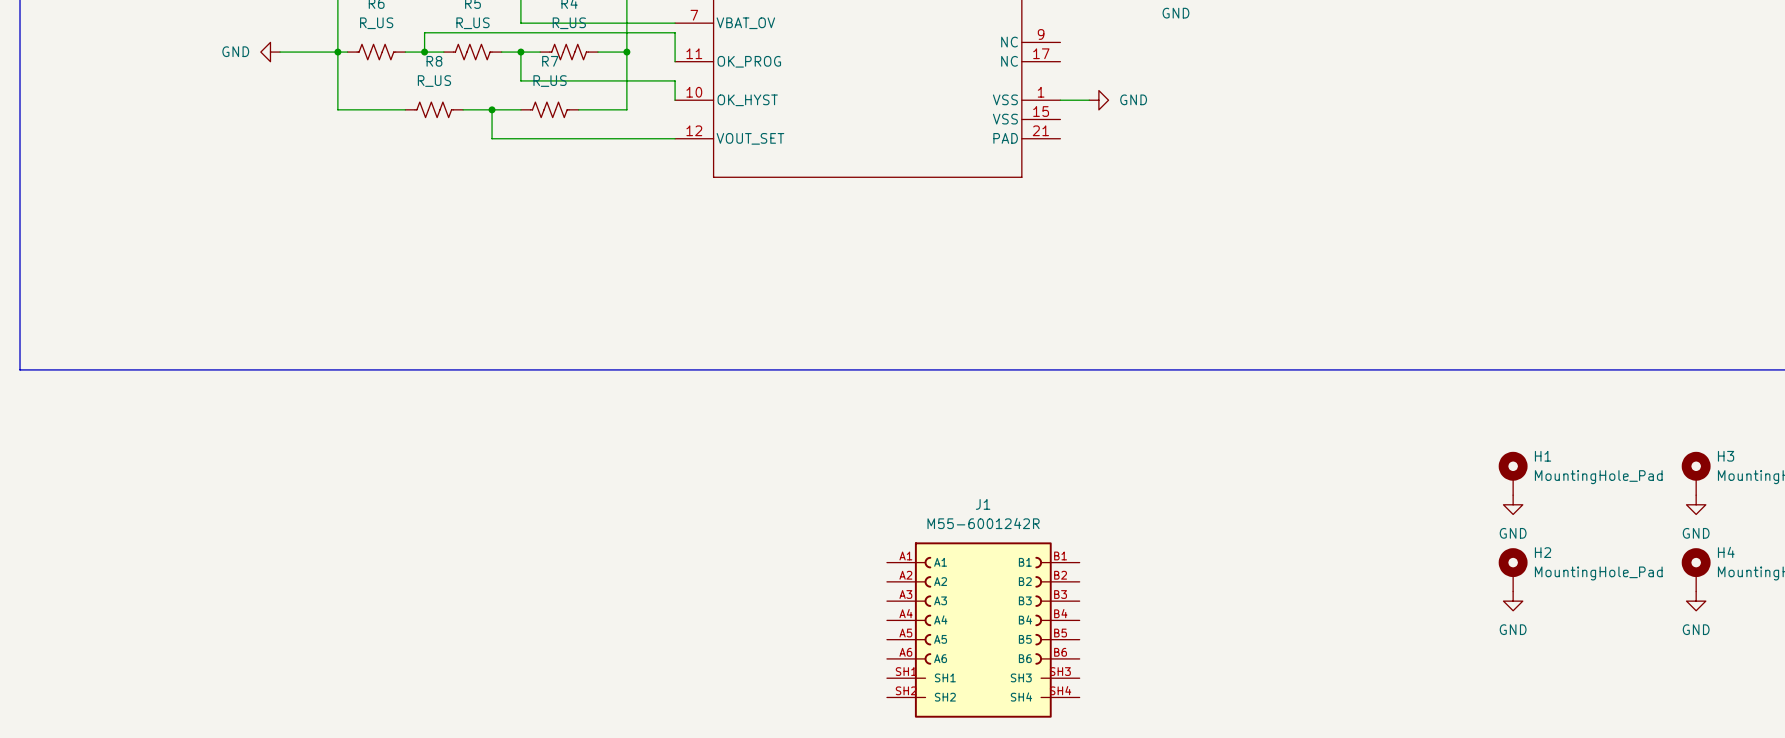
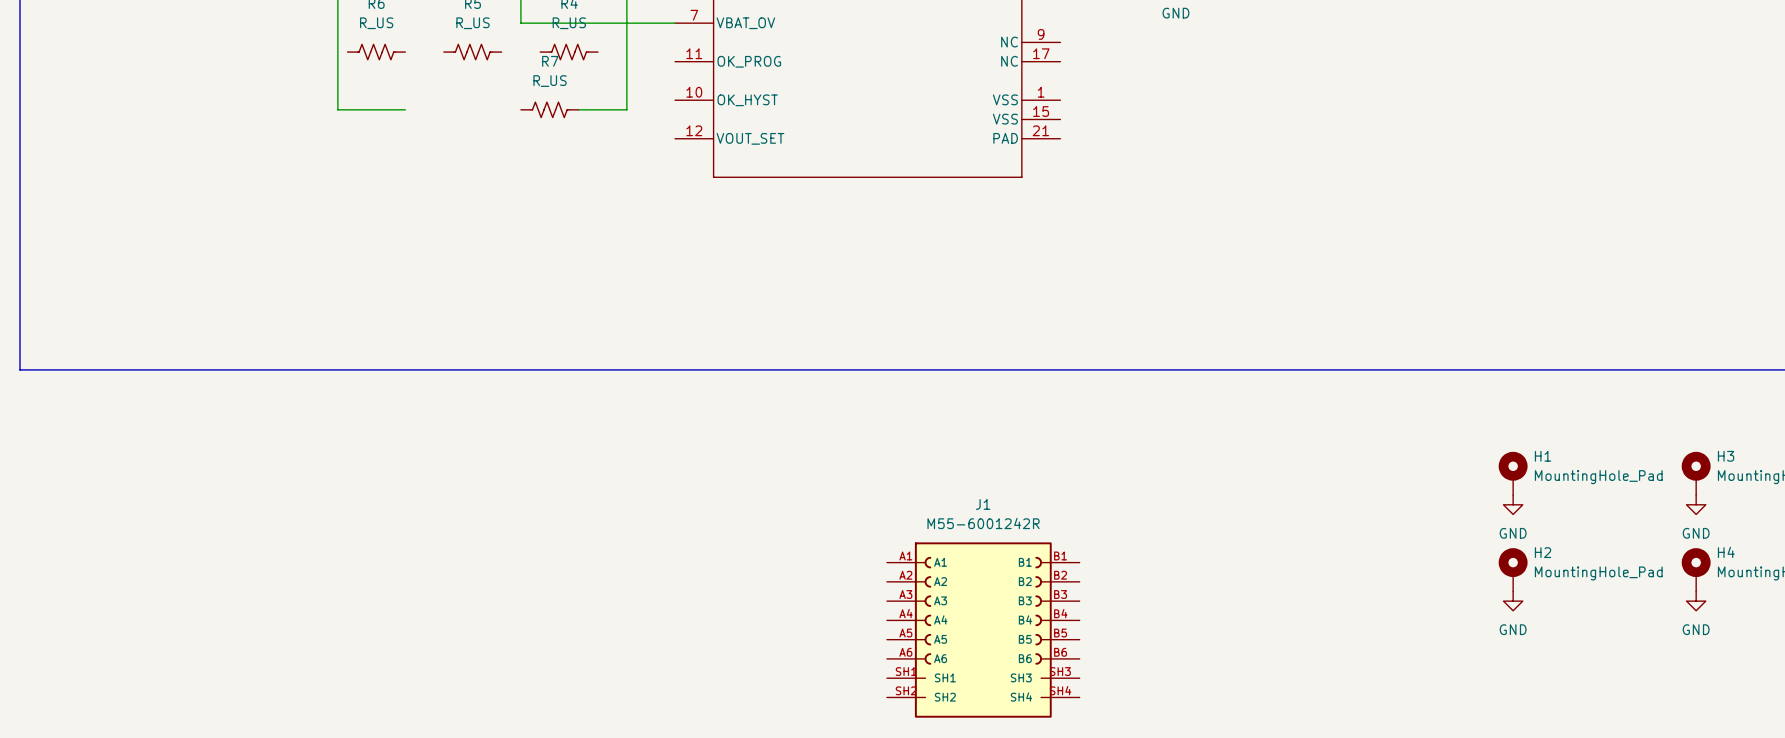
power symbol: GND (270, 52) -> none
wire: (280, 52) (347, 52) -> none
junction: (337, 52) -> none
wire: (405, 52) (443, 52) -> none
wire: (424, 52) (424, 32) (675, 32) (675, 61) -> none
junction: (424, 52) -> none
wire: (501, 52) (540, 52) -> none
wire: (520, 52) (520, 80) (675, 80) (675, 100) -> none
junction: (520, 52) -> none
wire: (597, 52) (626, 52) -> none
junction: (626, 52) -> none
wire: (1060, 100) (1089, 100) -> none
power symbol: GND (1098, 100) -> none
R8: R_US (434, 109) -> none
wire: (463, 109) (520, 109) -> none
wire: (492, 109) (492, 138) (675, 138) -> none
junction: (492, 109) -> none

